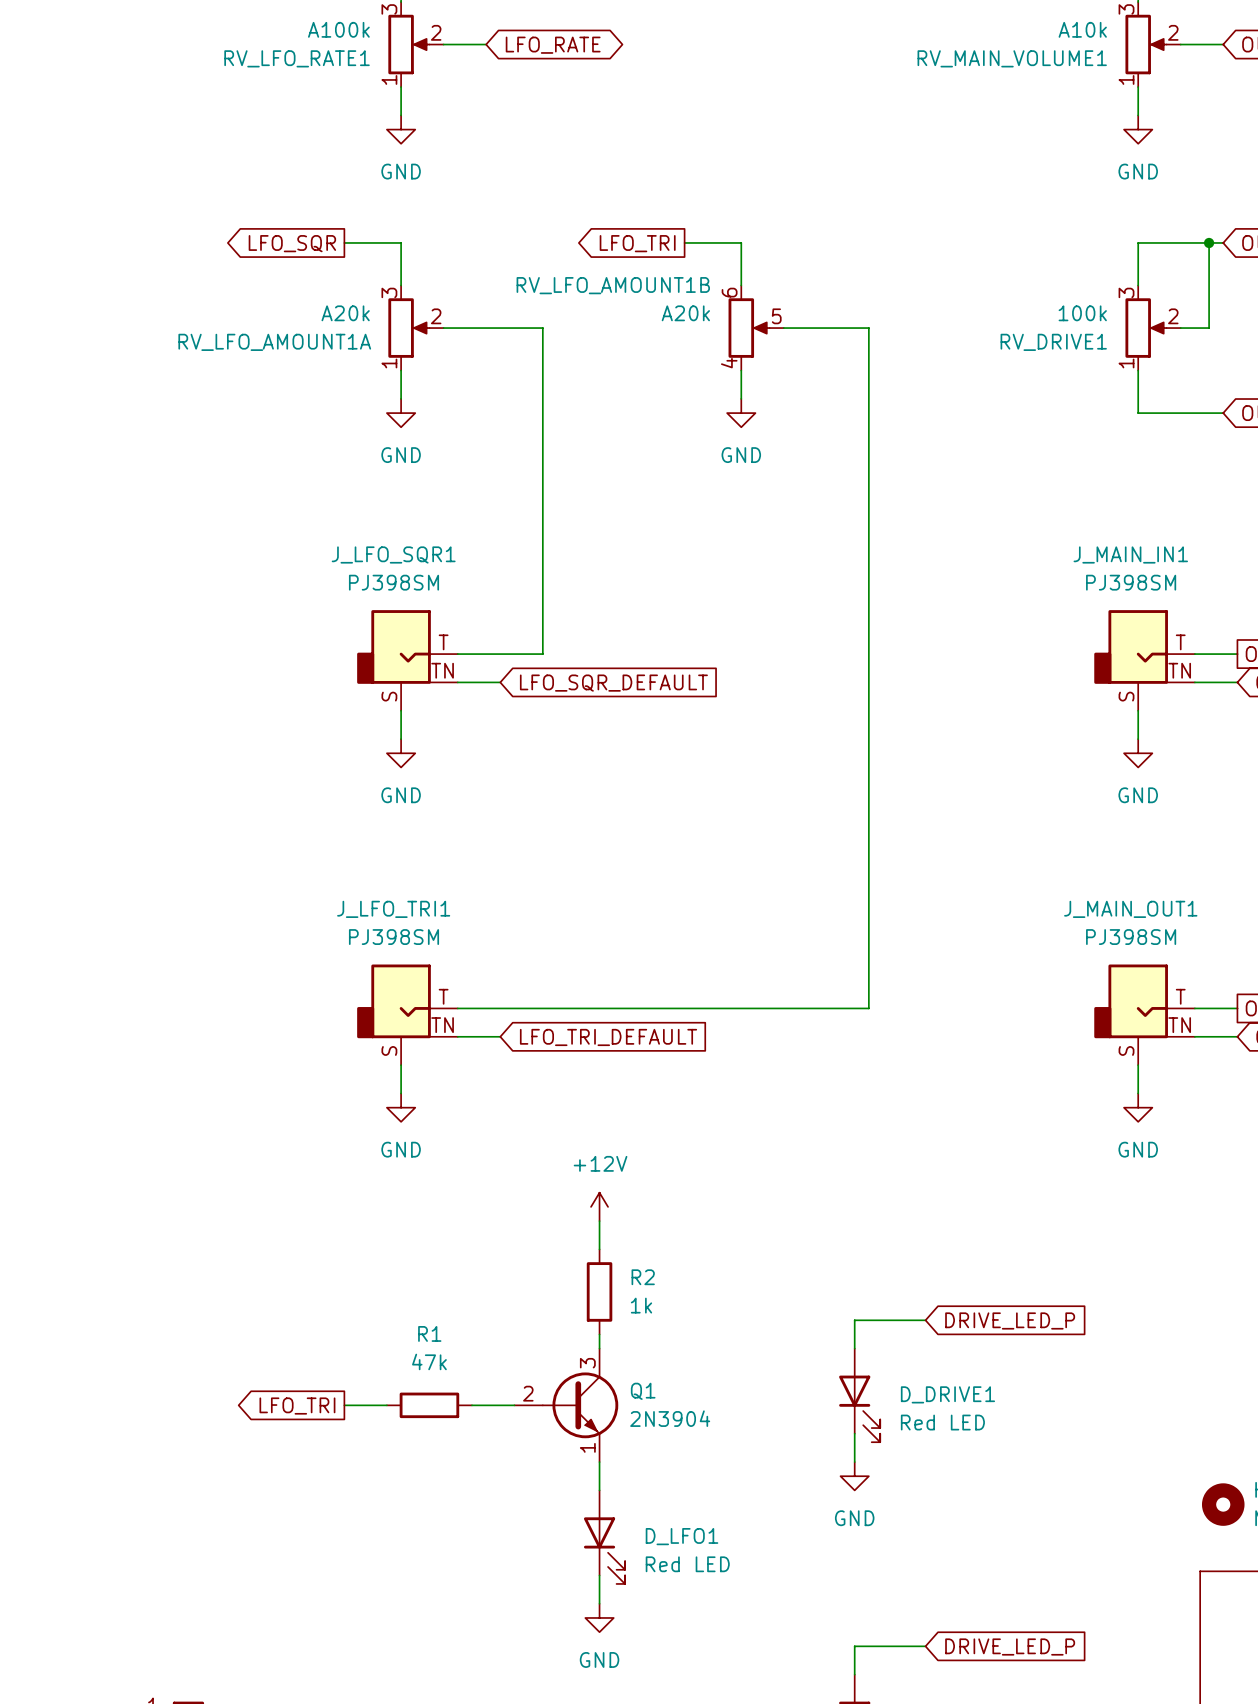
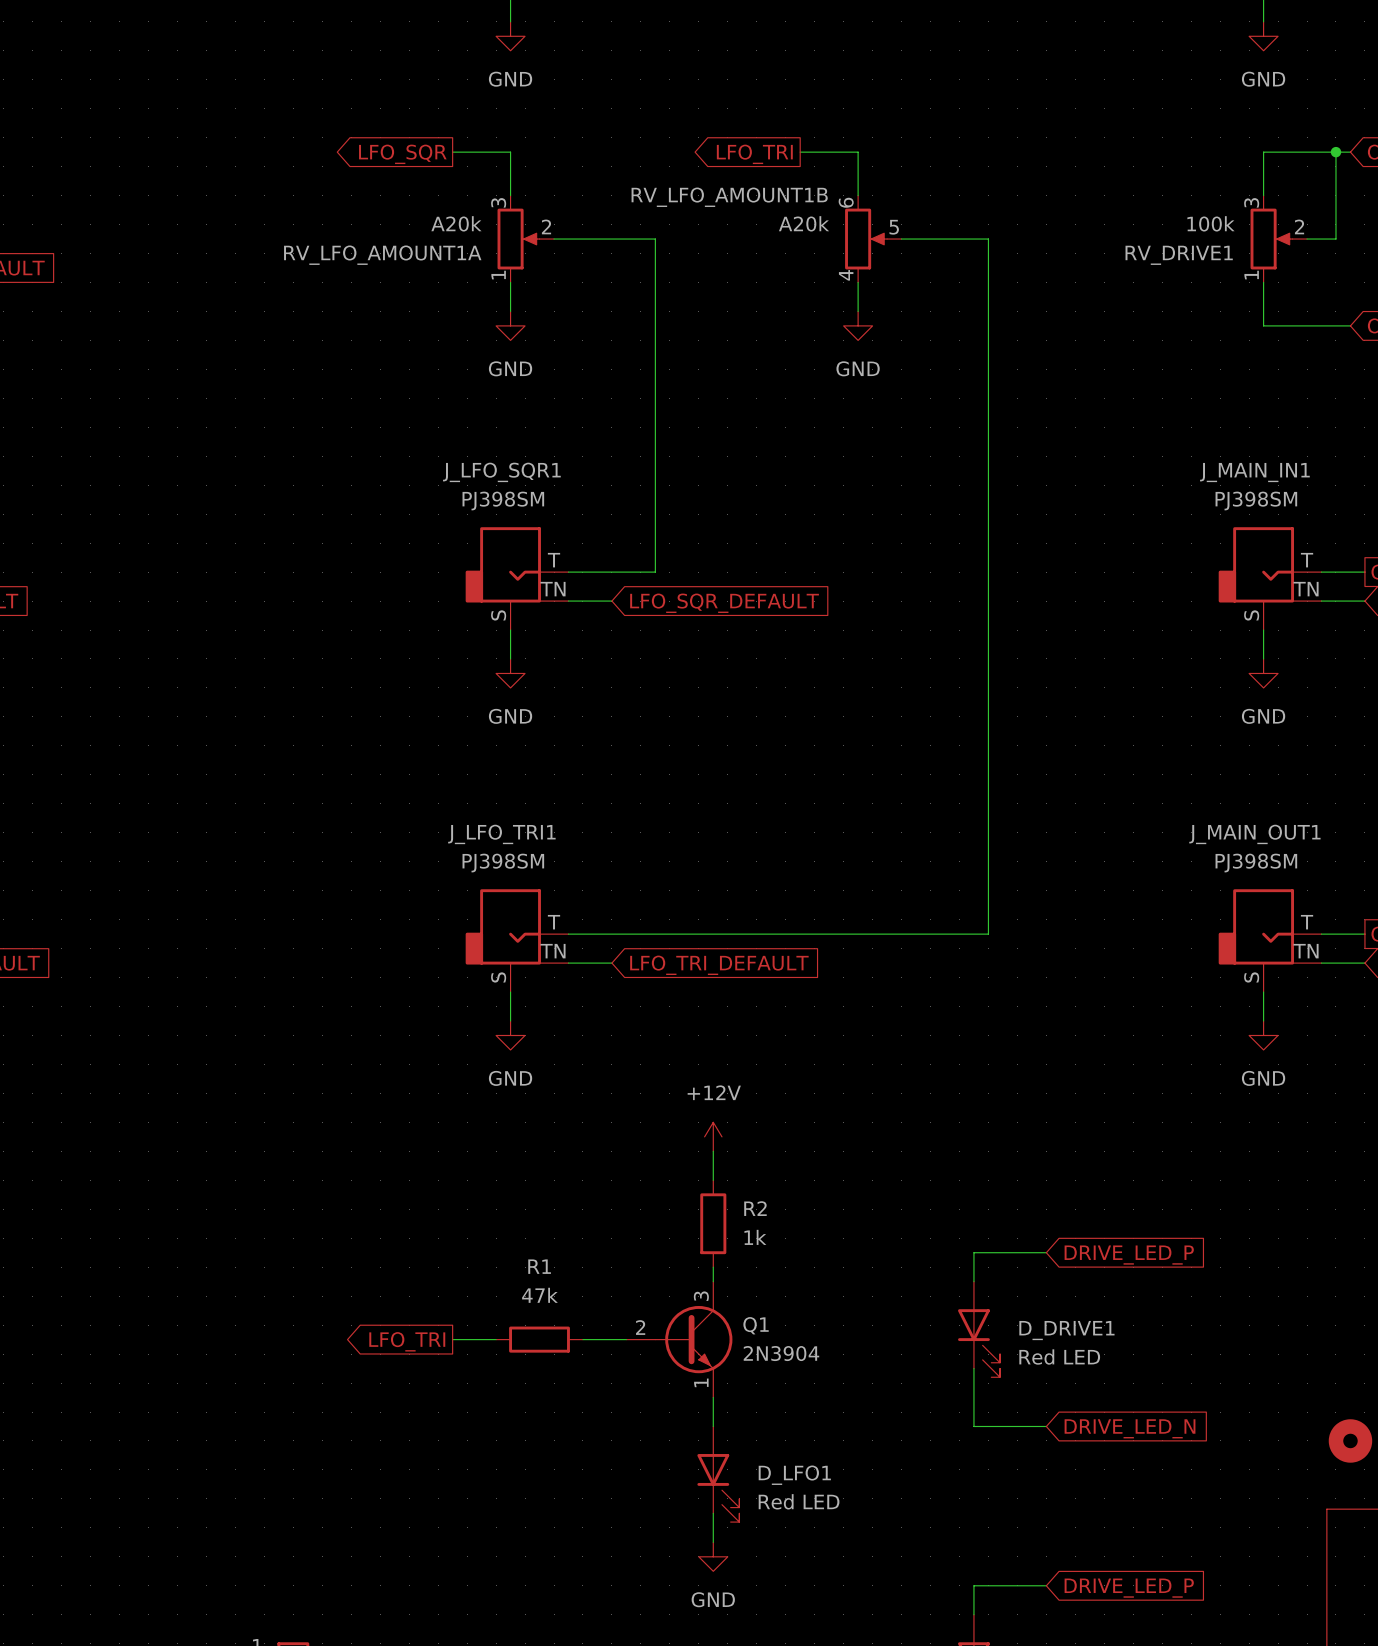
wire: none -> (973, 1397) (973, 1426) (1046, 1426)
power symbol: GND (854, 1476) -> none
global label: none -> DRIVE_LED_N (1130, 1428)

